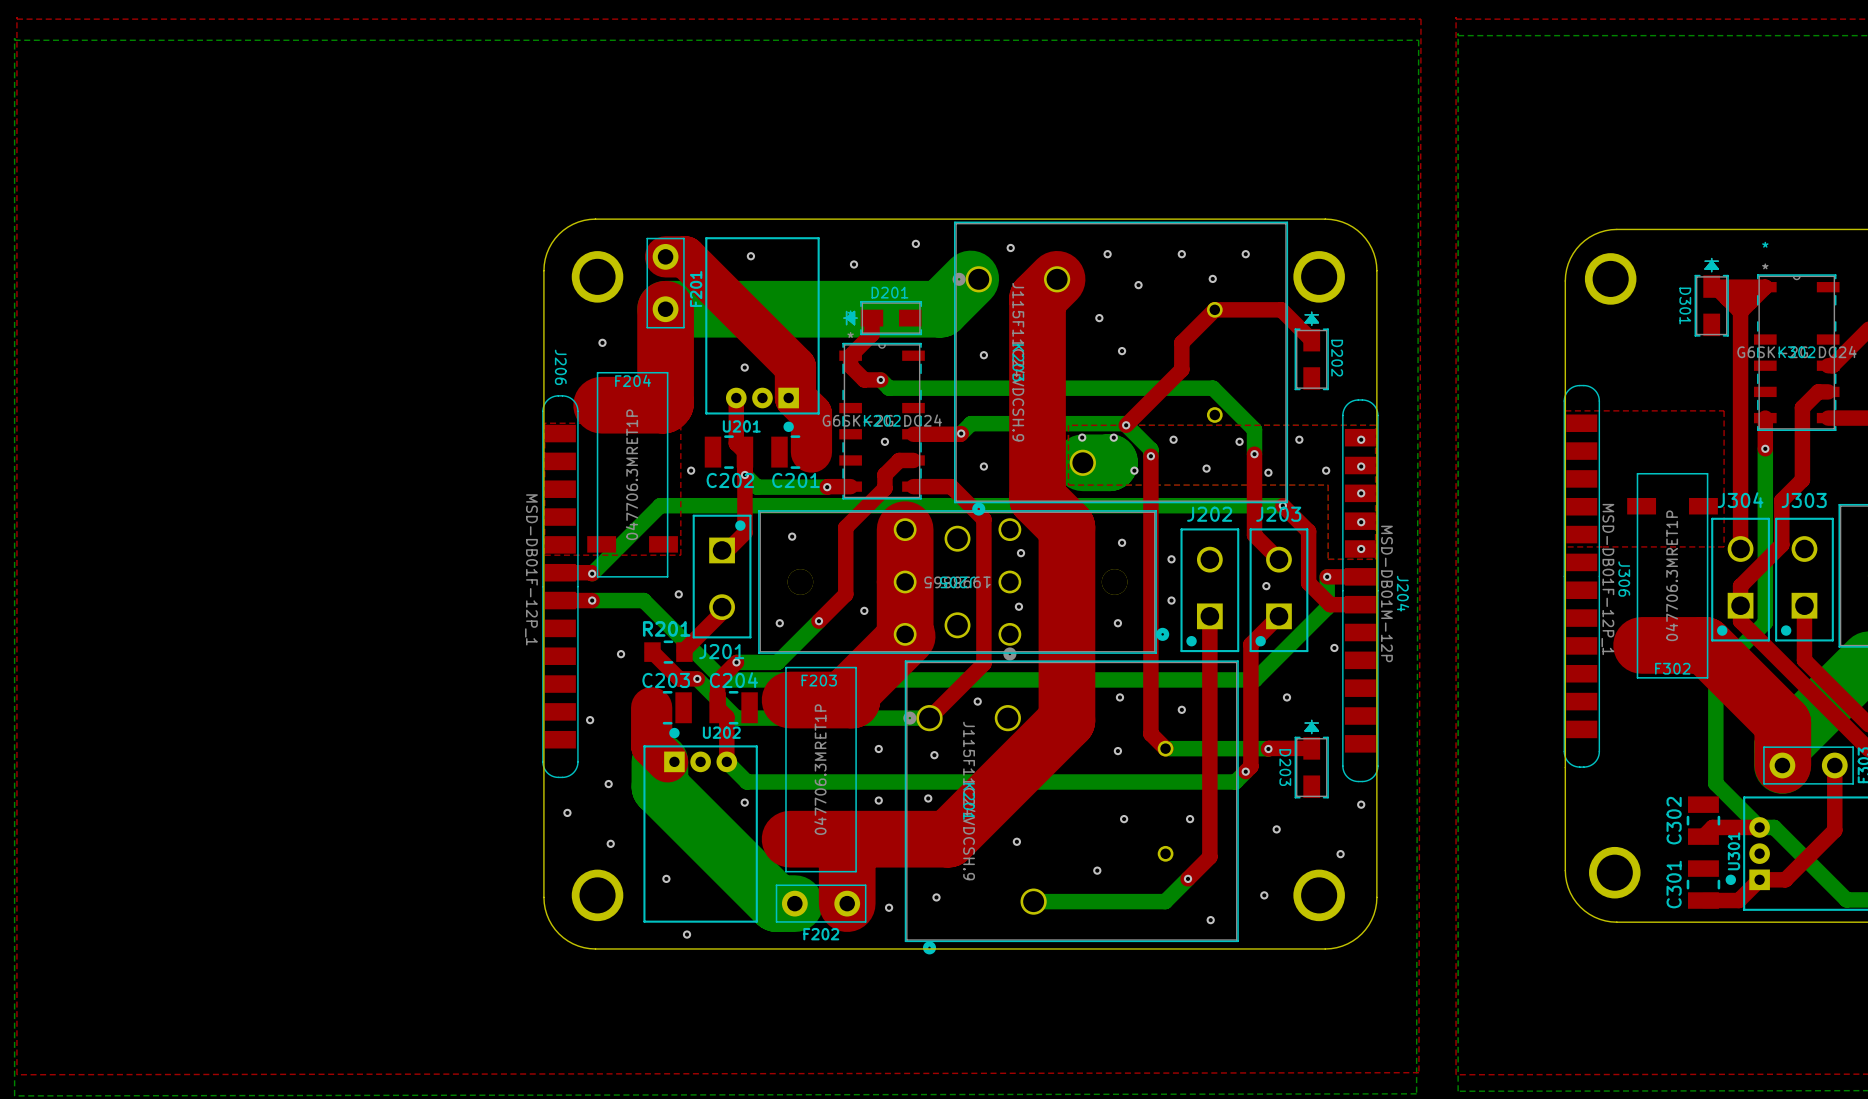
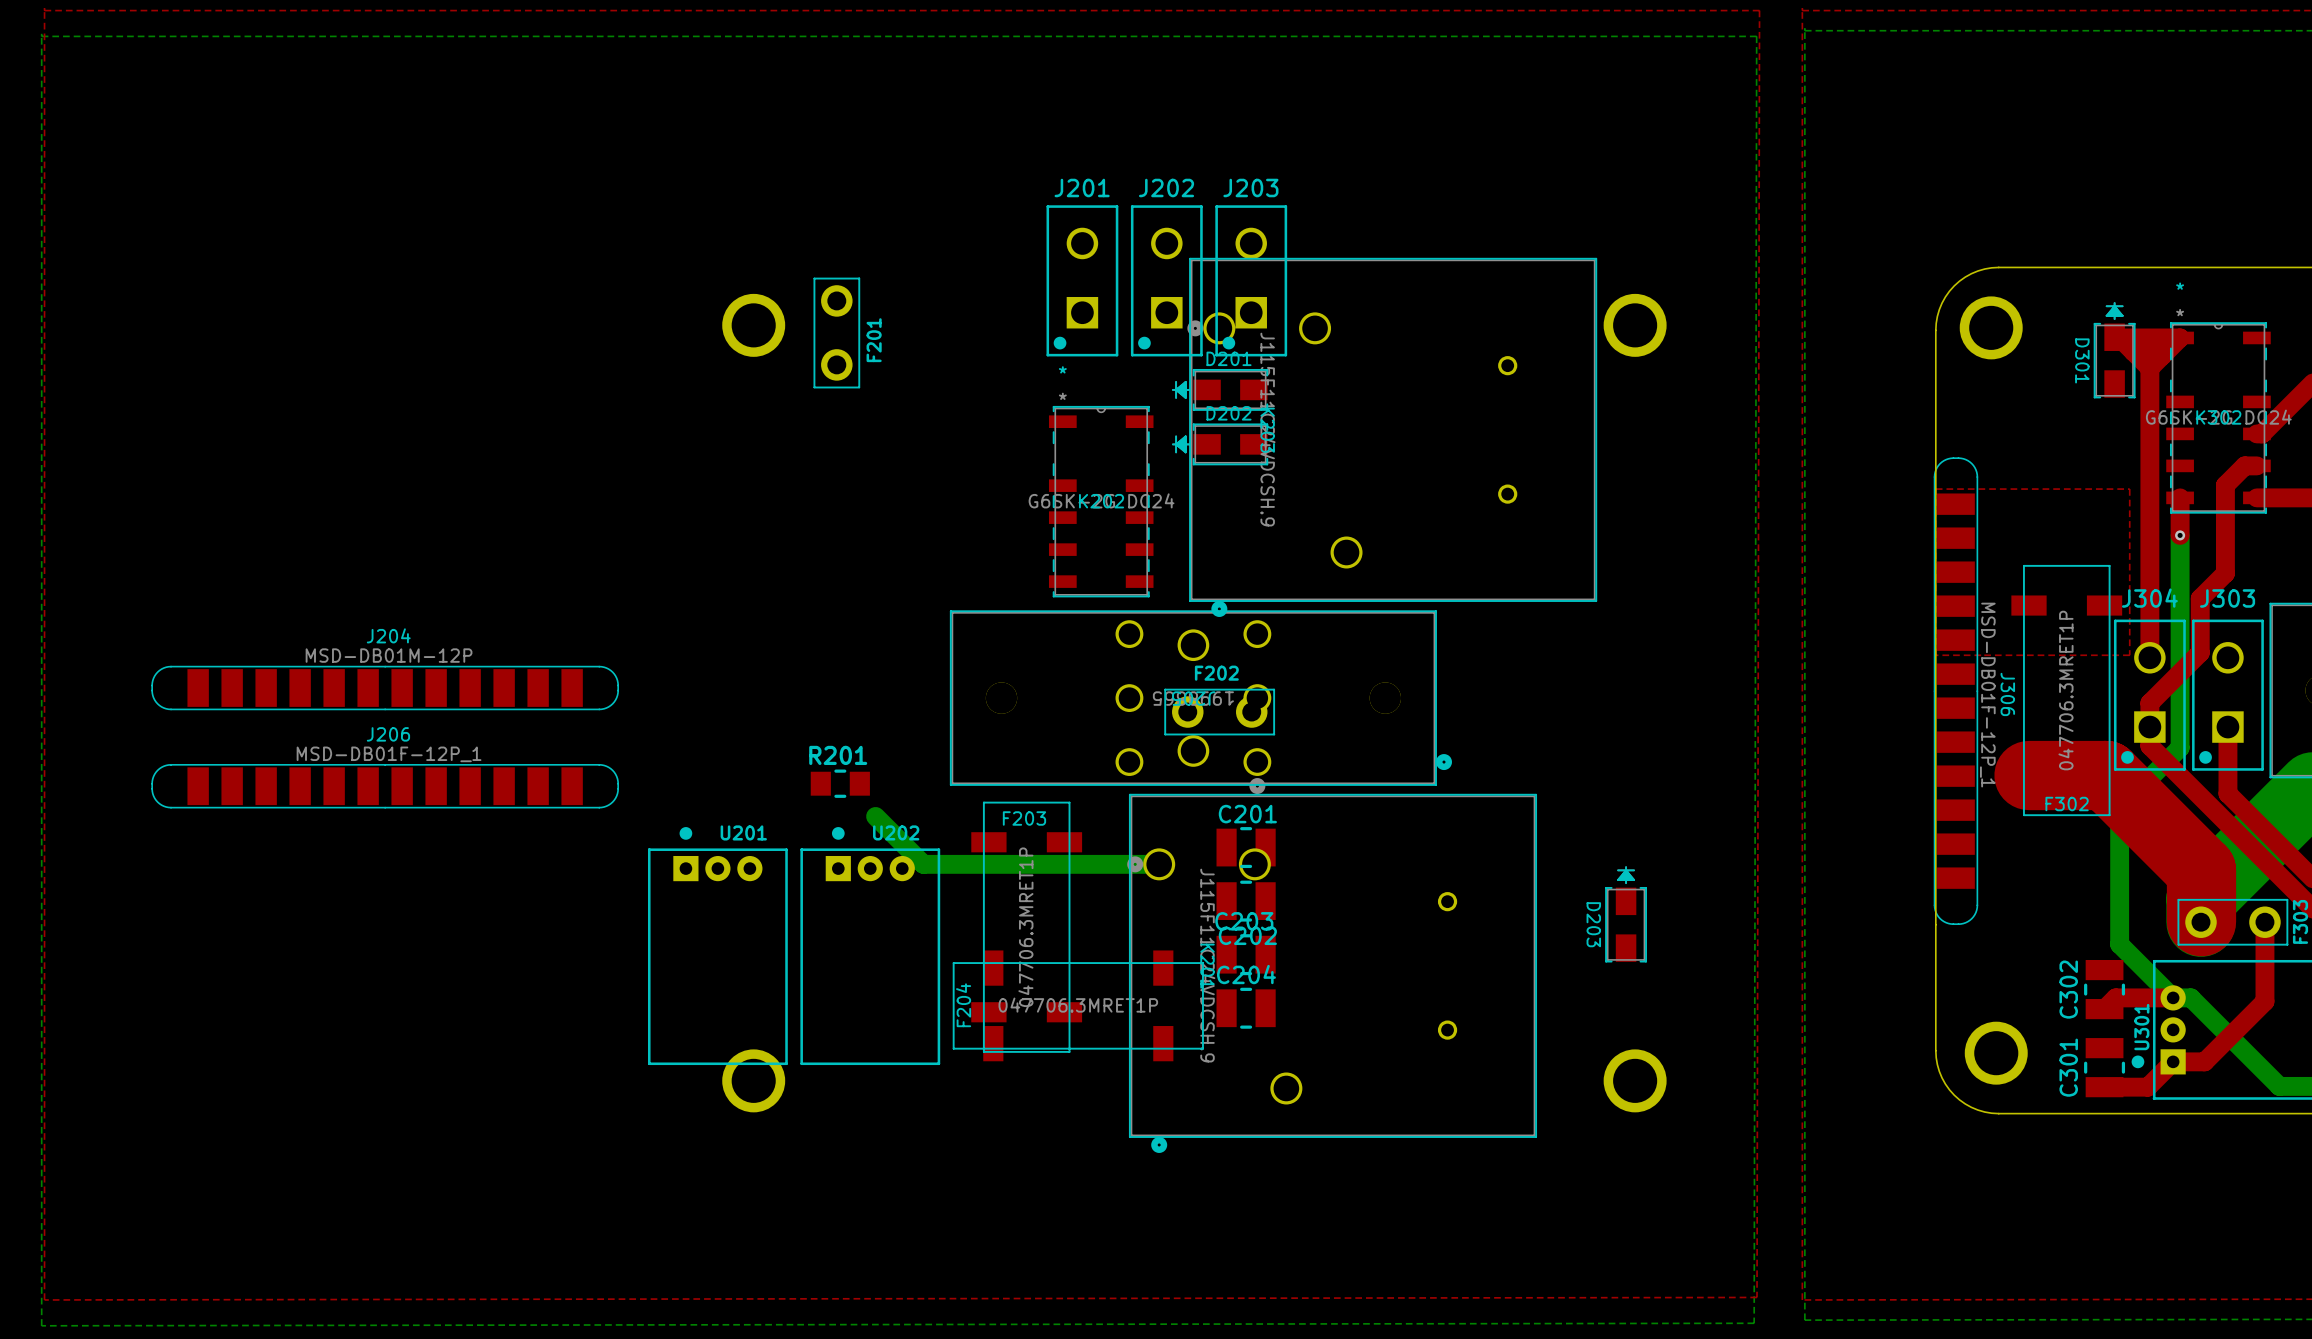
board edge: (595, 219) (1325, 219) (1342, 222) (1361, 234) (1373, 253) (1376, 270) (1376, 897) (1373, 914) (1361, 933) (1347, 943) (1325, 948) (595, 948) (573, 943) (559, 933) (546, 914) (543, 897) (543, 270) (549, 248) (559, 234) (578, 222) (595, 219) -> none
via: (915, 243) -> none
via: (1010, 247) -> none
via: (1107, 254) -> none
via: (1181, 254) -> none
via: (1245, 254) -> none
top track: (665, 256) (685, 256) (795, 366) (795, 398) (811, 413) (811, 452) -> none
via: (750, 256) -> none
via: (854, 264) -> none
bottom track: (970, 278) (940, 309) (665, 309) -> none
via: (1212, 278) -> none
top track: (1057, 279) (1037, 298) (1037, 498) (1066, 527) (1066, 720) (948, 839) (790, 839) -> none
via: (1138, 285) -> none
top track: (665, 309) (665, 403) (663, 405) (601, 405) -> none
top track: (871, 318) (871, 334) (850, 355) (850, 366) (864, 379) (880, 379) -> none
D201 position: (882, 318) -> (1220, 389)
via: (1099, 318) -> none
U201 rotation: 0° (762, 334) -> 180° (717, 946)
U201 position: (762, 334) -> (717, 946)
top track: (1311, 340) (1281, 309) (1214, 309) (1181, 342) (1181, 369) (1126, 425) -> none
via: (602, 342) -> none
D202 rotation: 0° (1311, 350) -> 90° counterclockwise (1220, 444)
D202 position: (1311, 350) -> (1220, 444)
via: (1122, 351) -> none
via: (983, 355) -> none
J206 name position: J206 (560, 367) -> J206 (388, 734)
via: (744, 367) -> none
bottom track: (880, 379) (889, 388) (1212, 388) (1254, 429) (1254, 454) -> none
via: (880, 379) -> none
F204 name position: F204 (633, 380) -> F204 (963, 1005)
top track: (736, 398) (736, 443) (744, 452) (744, 532) (727, 550) -> none
top zone outline: (544, 423) (680, 423) (680, 555) (544, 555) (544, 423) -> none
top zone outline: (1068, 425) (1375, 425) (1375, 559) (1328, 559) (1328, 485) (1068, 485) (1068, 425) -> none
via: (1126, 425) -> none
top track: (961, 433) (913, 434) -> none
bottom track: (961, 433) (971, 423) (1124, 423) (1150, 449) (1150, 456) -> none
via: (961, 433) -> none
via: (1082, 437) -> none
via: (1113, 437) -> none
via: (1173, 439) -> none
via: (1299, 439) -> none
via: (1361, 439) -> none
via: (884, 441) -> none
via: (1239, 441) -> none
C202 position: (728, 452) -> (1246, 901)
C201 position: (795, 452) -> (1246, 847)
top track: (1254, 454) (1254, 535) (1278, 559) -> none
via: (1254, 454) -> none
top track: (1150, 456) (1150, 733) (1165, 748) -> none
via: (1150, 456) -> none
top track: (913, 460) (899, 460) (884, 474) (884, 488) (845, 527) (845, 594) (818, 621) -> none
bottom track: (1109, 462) (1082, 462) -> none
via: (983, 466) -> none
via: (1361, 466) -> none
via: (1206, 468) -> none
via: (691, 470) -> none
via: (1134, 470) -> none
via: (1326, 470) -> none
via: (1268, 472) -> none
F204 rotation: 0° (632, 474) -> 90° clockwise (1078, 1005)
F204 position: (632, 474) -> (1078, 1005)
bottom track: (744, 474) (757, 487) (827, 487) -> none
via: (744, 474) -> none
C201 name position: C201 (795, 480) -> C201 (1247, 814)
top track: (850, 486) (827, 487) -> none
top track: (913, 486) (951, 486) (983, 519) (983, 663) (929, 718) -> none
via: (827, 487) -> none
via: (1361, 493) -> none
top track: (1282, 505) (1308, 531) (1308, 583) (1330, 604) (1360, 604) -> none
bottom track: (1282, 505) (660, 505) (592, 573) -> none
via: (1282, 505) -> none
via: (1361, 522) -> none
top track: (905, 529) (905, 634) -> none
via: (792, 536) -> none
via: (1122, 542) -> none
via: (1361, 549) -> none
via: (1021, 553) -> none
via: (1171, 559) -> none
top track: (560, 572) (592, 573) -> none
via: (592, 573) -> none
J201 rotation: 0° (722, 576) -> 180° (1082, 280)
J201 position: (722, 576) -> (1082, 280)
top track: (1327, 576) (1360, 576) -> none
bottom track: (1327, 576) (1327, 607) (1255, 679) (723, 679) (643, 600) (592, 600) -> none
via: (1327, 576) -> none
J206 rotation: 0° (560, 586) -> 90° clockwise (385, 786)
J206 position: (560, 586) -> (385, 786)
via: (1266, 586) -> none
J202 position: (1209, 590) -> (1166, 280)
J203 position: (1278, 590) -> (1251, 280)
J204 rotation: 0° (1360, 590) -> 90° clockwise (385, 688)
J204 position: (1360, 590) -> (385, 688)
J204 value position: MSD-DB01M-12P (1386, 593) -> MSD-DB01M-12P (389, 655)
J204 name position: J204 (1403, 593) -> J204 (388, 635)
via: (678, 594) -> none
top track: (560, 600) (592, 600) -> none
via: (592, 600) -> none
via: (1171, 600) -> none
via: (1018, 606) -> none
top track: (727, 607) (684, 652) -> none
via: (864, 610) -> none
top track: (1209, 616) (1209, 857) (1188, 878) -> none
top track: (1278, 616) (1250, 644) (1250, 766) (1245, 771) -> none
bottom track: (818, 621) (777, 662) (736, 662) -> none
via: (818, 621) -> none
via: (779, 623) -> none
via: (1117, 623) -> none
top track: (907, 636) (851, 691) (851, 700) (790, 700) -> none
via: (1334, 647) -> none
top track: (652, 652) (679, 678) (697, 678) -> none
via: (621, 654) -> none
top track: (736, 662) (717, 681) (717, 707) (726, 716) (726, 761) -> none
via: (736, 662) -> none
via: (697, 678) -> none
via: (1119, 697) -> none
via: (1286, 697) -> none
via: (977, 701) -> none
top track: (651, 707) (651, 745) (667, 761) -> none
C203 position: (667, 707) -> (1246, 954)
C204 position: (733, 707) -> (1246, 1008)
via: (1181, 709) -> none
via: (590, 720) -> none
bottom track: (1165, 748) (1268, 749) -> none
top track: (1311, 748) (1268, 749) -> none
via: (878, 749) -> none
via: (1268, 749) -> none
via: (1117, 751) -> none
via: (934, 755) -> none
bottom track: (659, 761) (659, 786) (776, 903) (794, 903) -> none
bottom track: (726, 761) (746, 781) (1235, 781) (1245, 771) -> none
via: (1245, 771) -> none
via: (608, 784) -> none
via: (928, 798) -> none
via: (878, 800) -> none
via: (744, 802) -> none
via: (1361, 804) -> none
via: (567, 812) -> none
via: (1124, 819) -> none
via: (1190, 819) -> none
U202 position: (700, 825) -> (870, 946)
via: (1276, 829) -> none
top track: (851, 839) (847, 843) (847, 903) -> none
via: (1016, 841) -> none
via: (610, 843) -> none
via: (1340, 854) -> none
via: (1097, 870) -> none
via: (666, 878) -> none
bottom track: (1188, 878) (1165, 901) (1033, 901) -> none
via: (1188, 878) -> none
via: (1264, 895) -> none
via: (936, 897) -> none
F202 rotation: 0° (821, 903) -> 180° (1219, 712)
F202 position: (821, 903) -> (1219, 712)
via: (889, 907) -> none
via: (1210, 920) -> none
via: (687, 934) -> none

